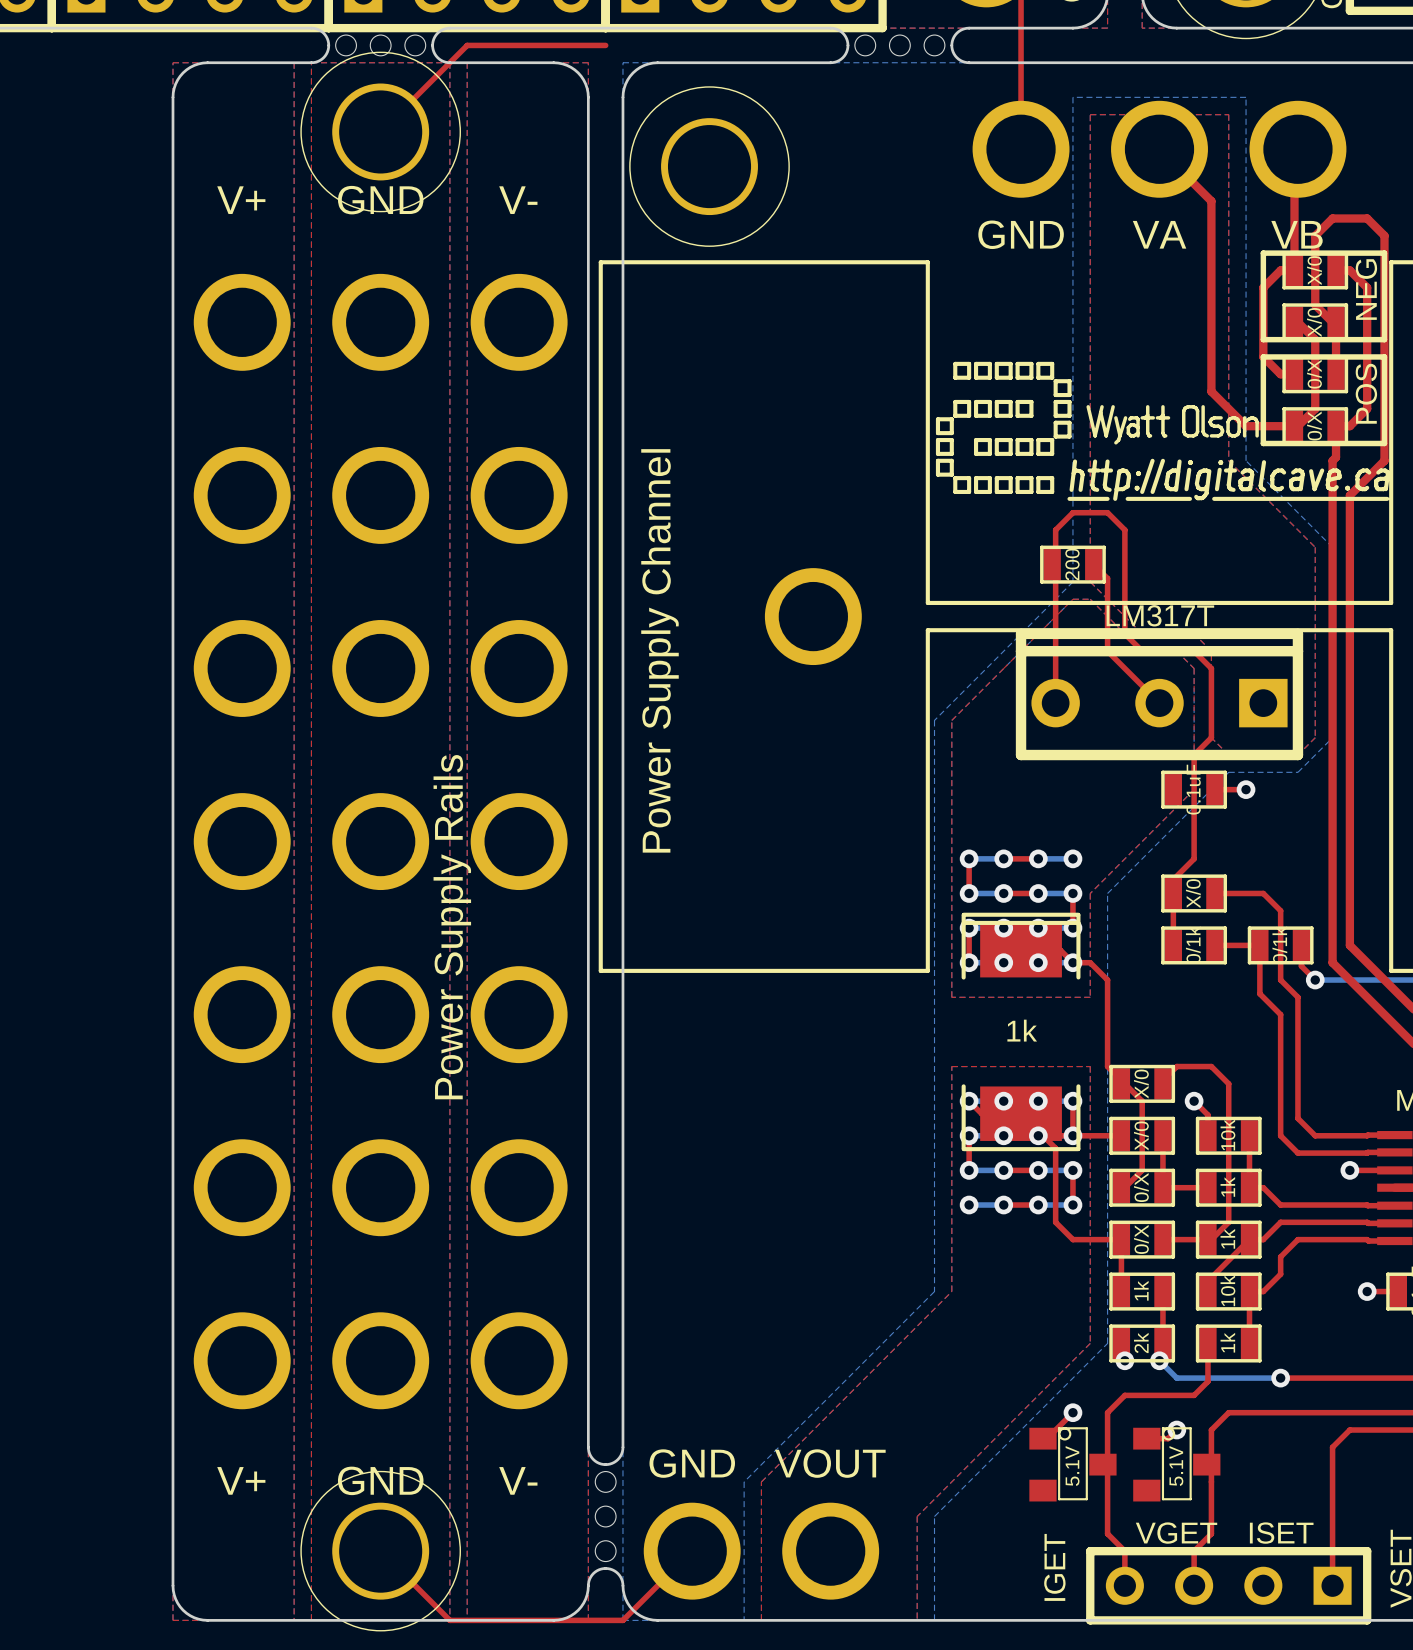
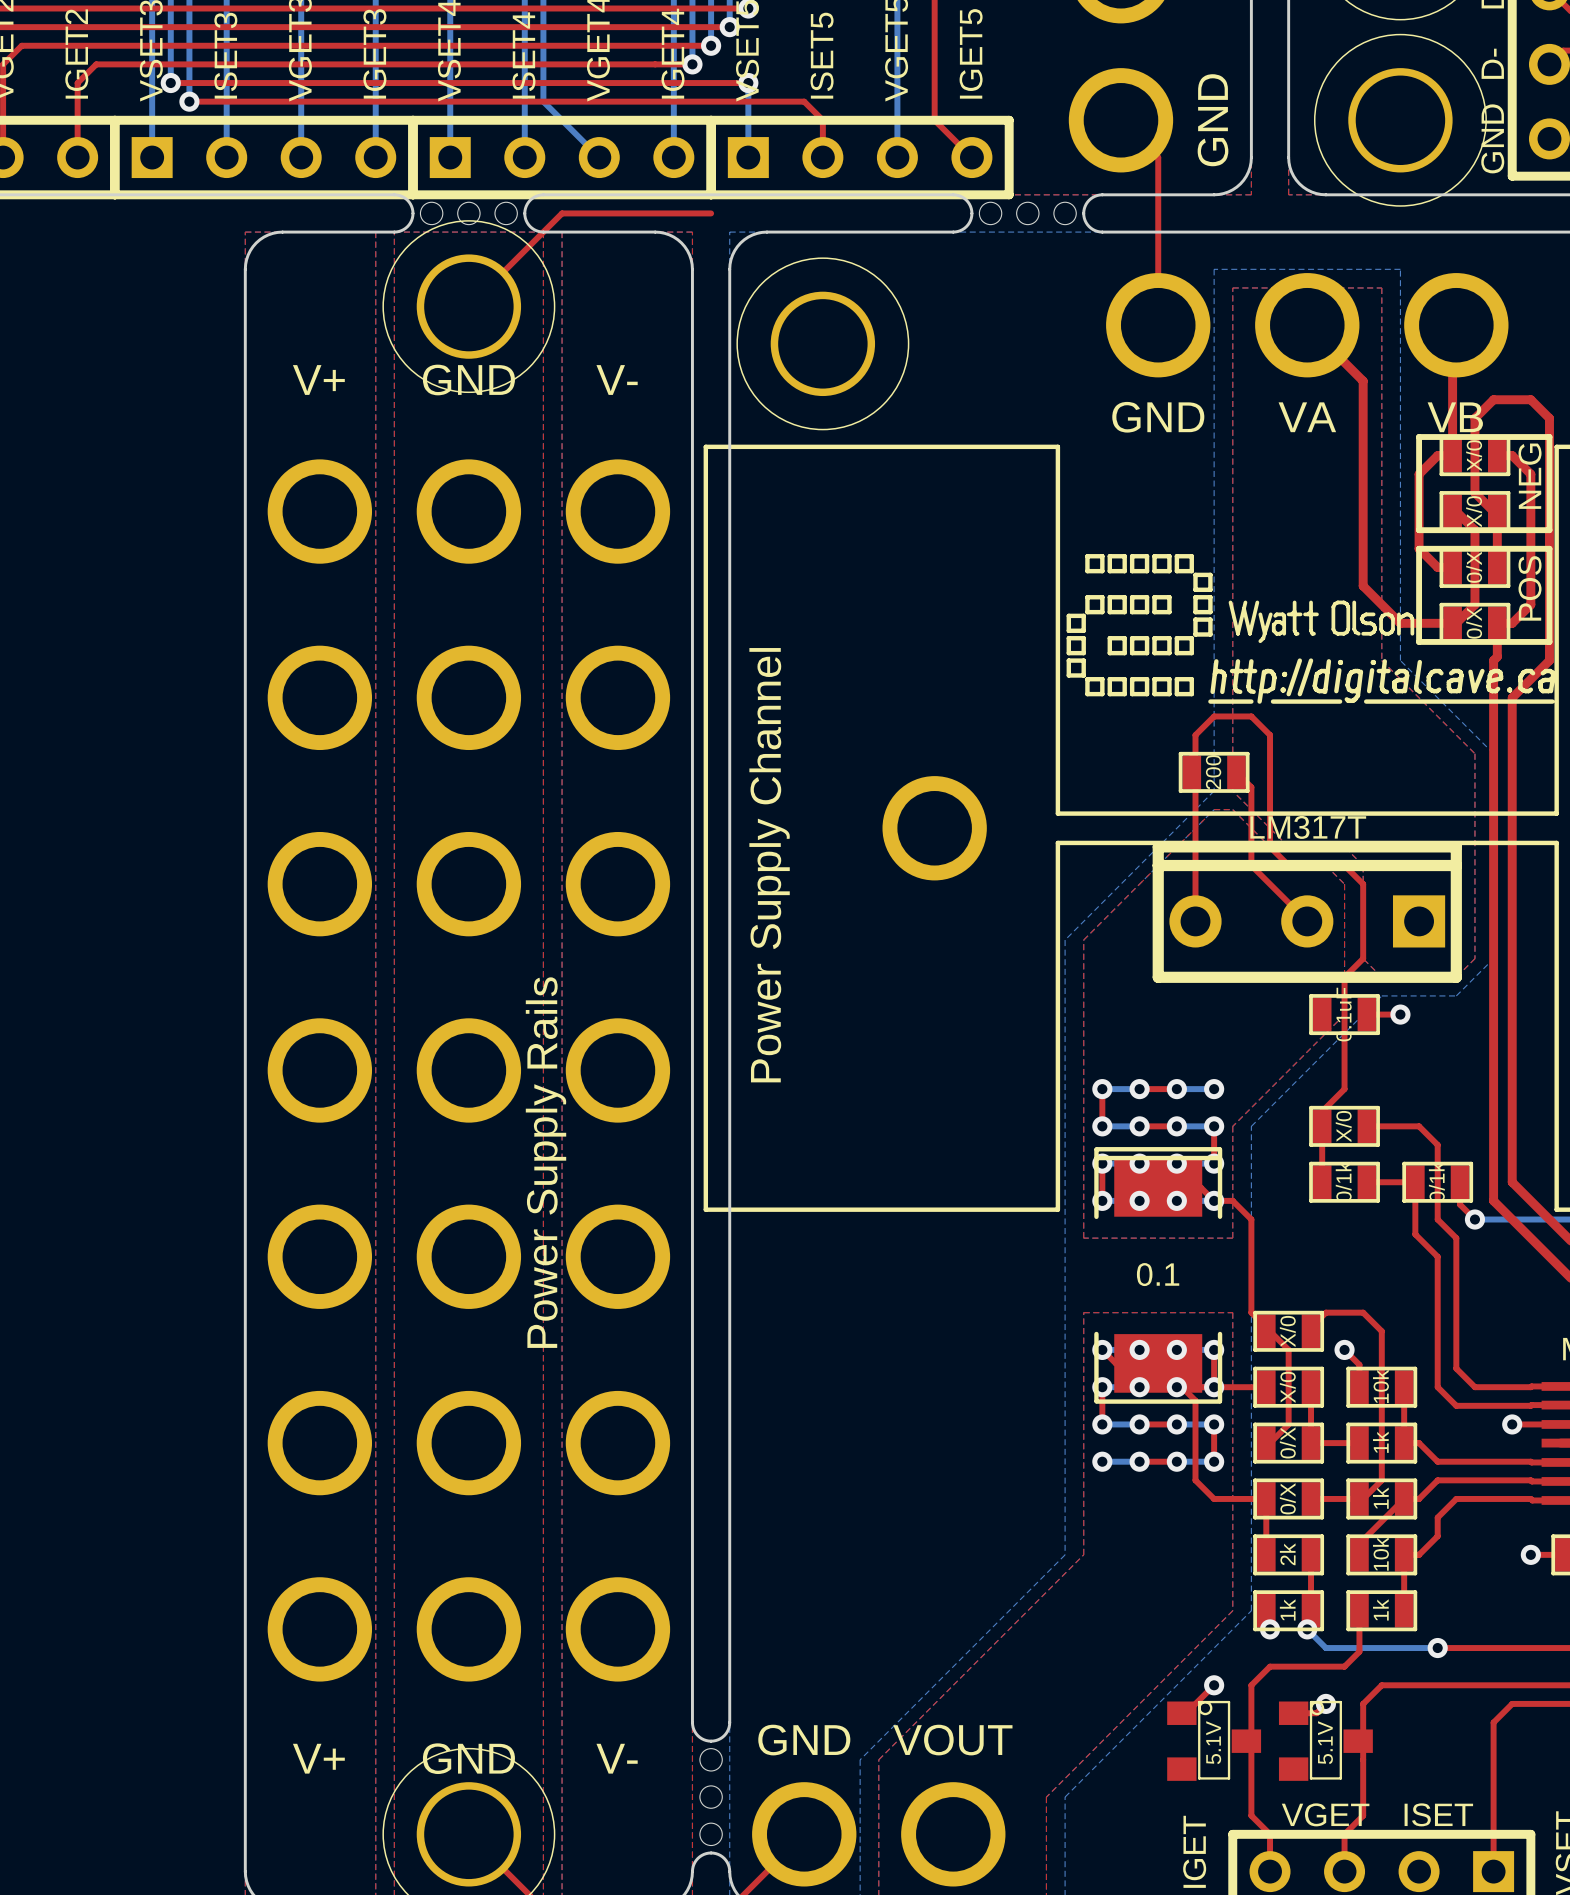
part value: 1k (1022, 1030) -> 0.1 (1158, 1274)
part value: 1k (1141, 1290) -> 2k (1287, 1554)
part value: 2k (1141, 1342) -> 1k (1287, 1609)

